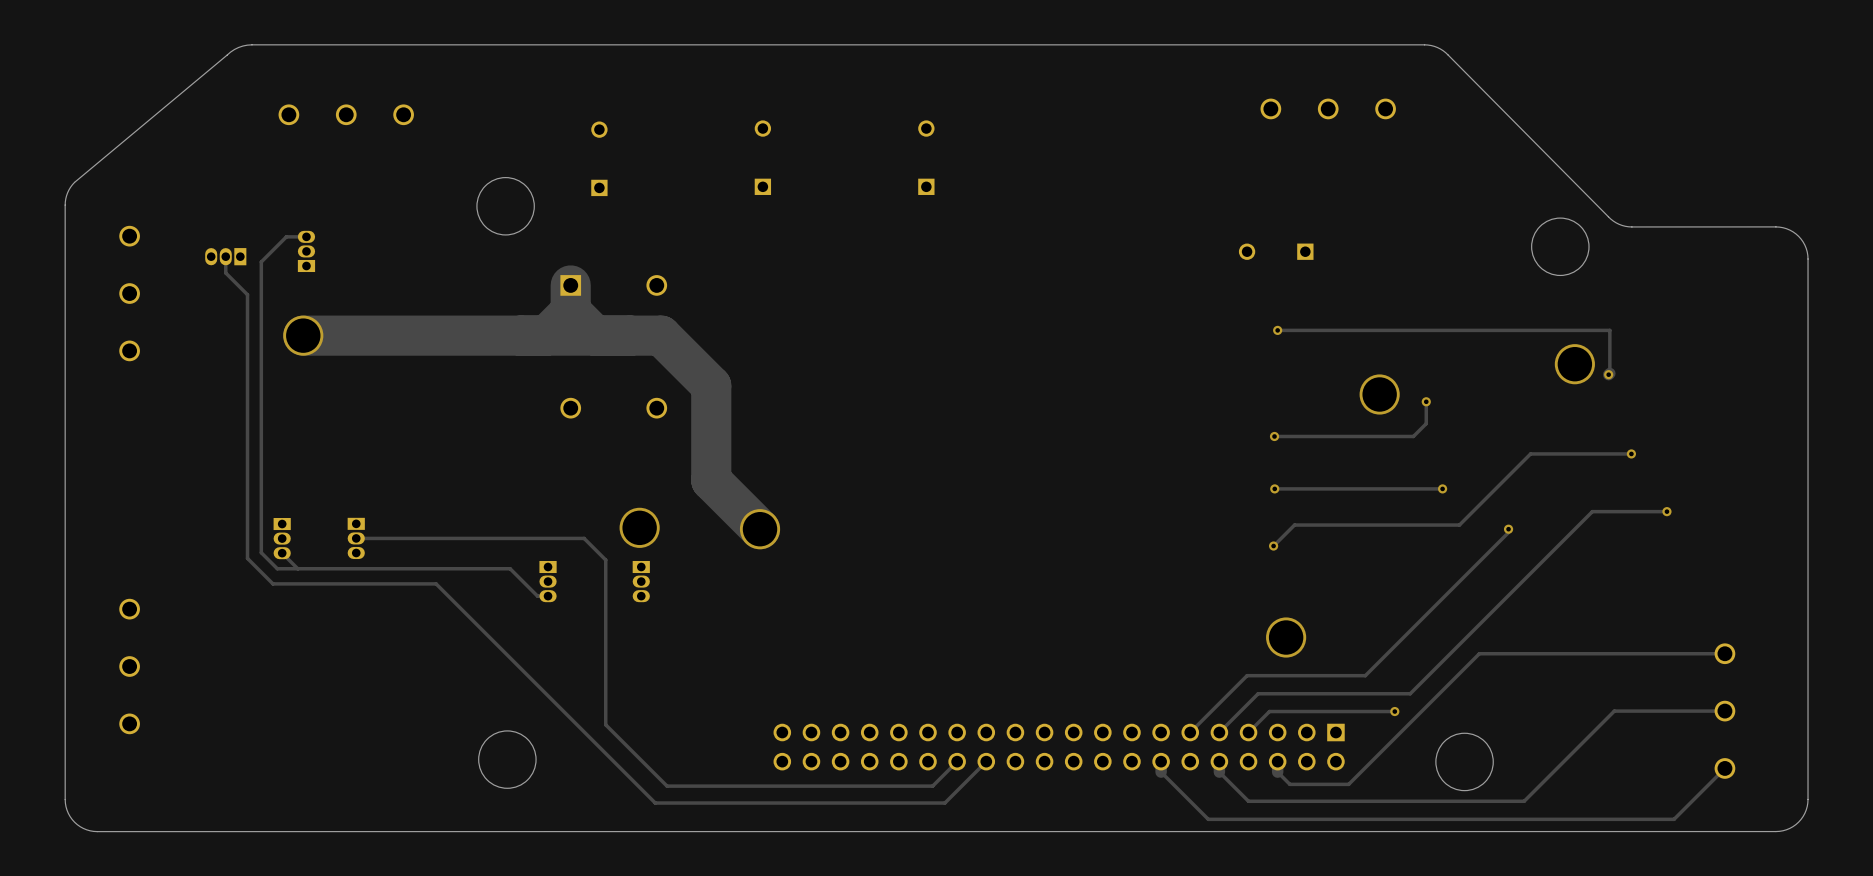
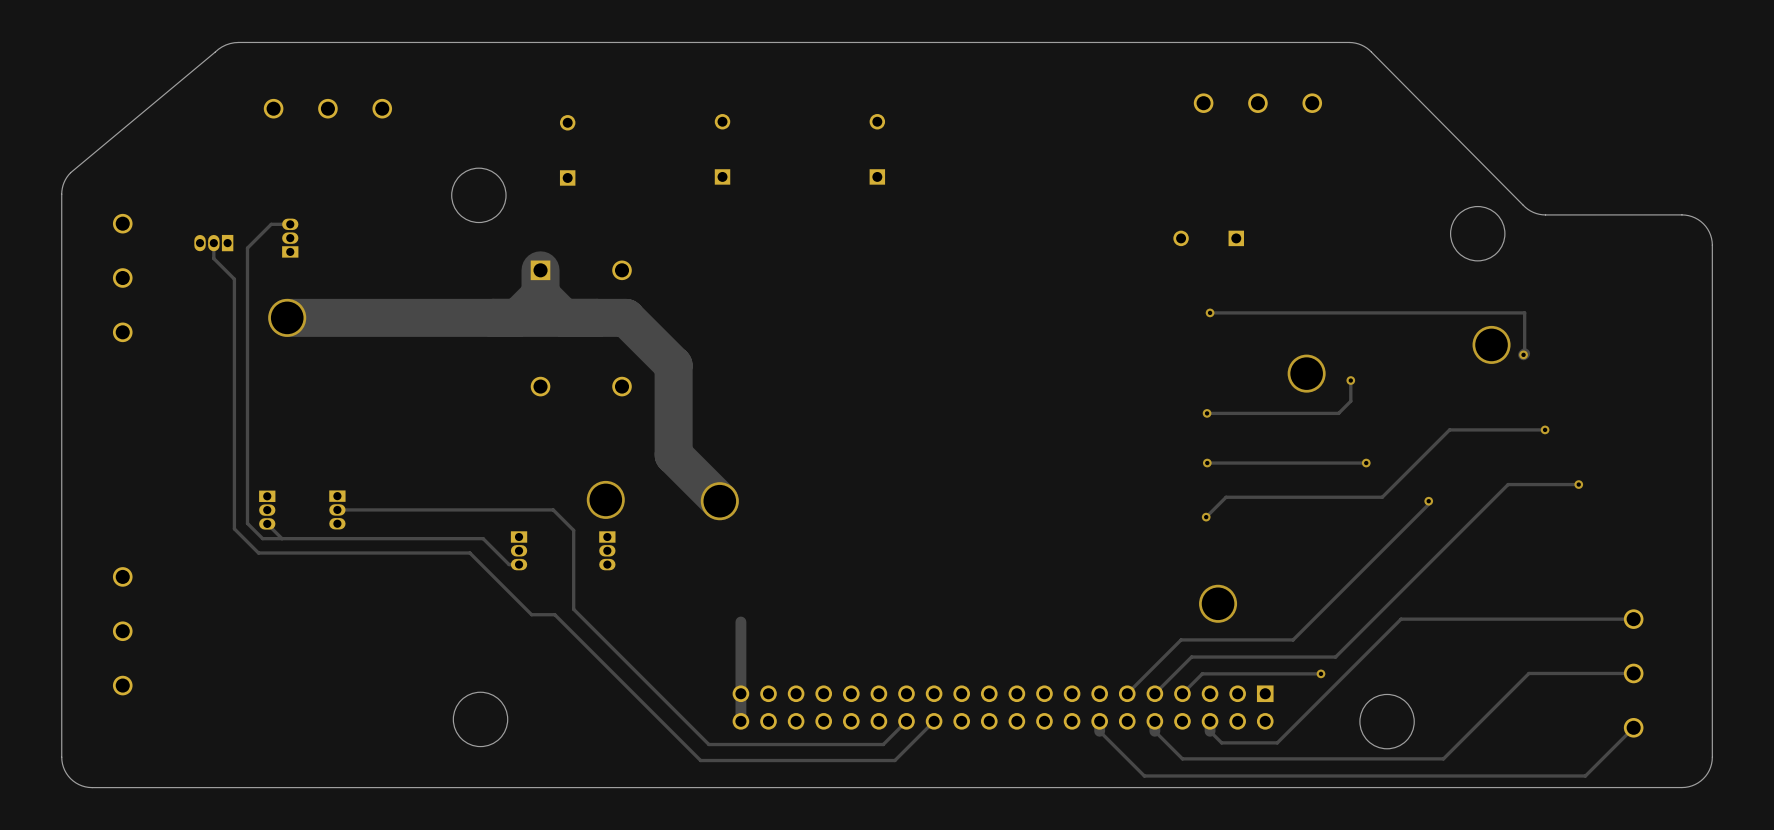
track: (436, 583) (655, 803) (739, 803) -> (413, 553) (469, 553) (531, 614) (554, 614) (700, 760)
track: (605, 643) (605, 724) (667, 786) (748, 786) -> (573, 609) (708, 744)
track: none -> (740, 621) (740, 721)

